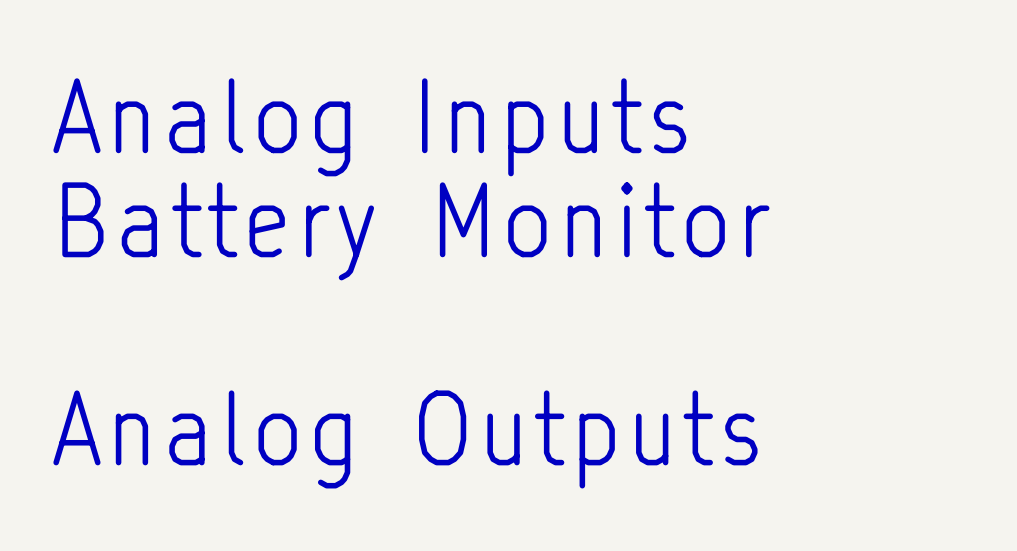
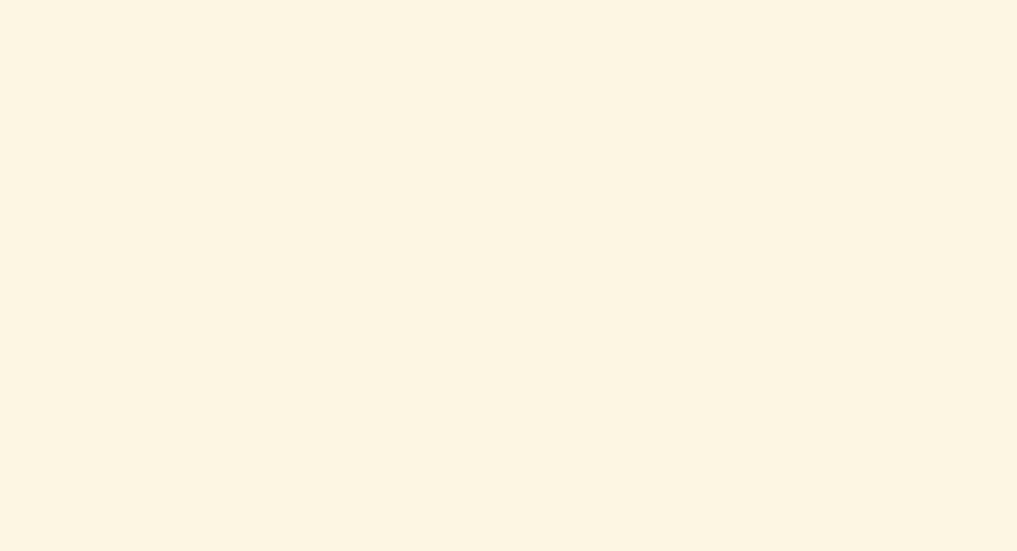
text: Analog Inputs (369, 127) -> none
text: Battery Monitor (415, 231) -> none
text: Analog Outputs (405, 439) -> none

